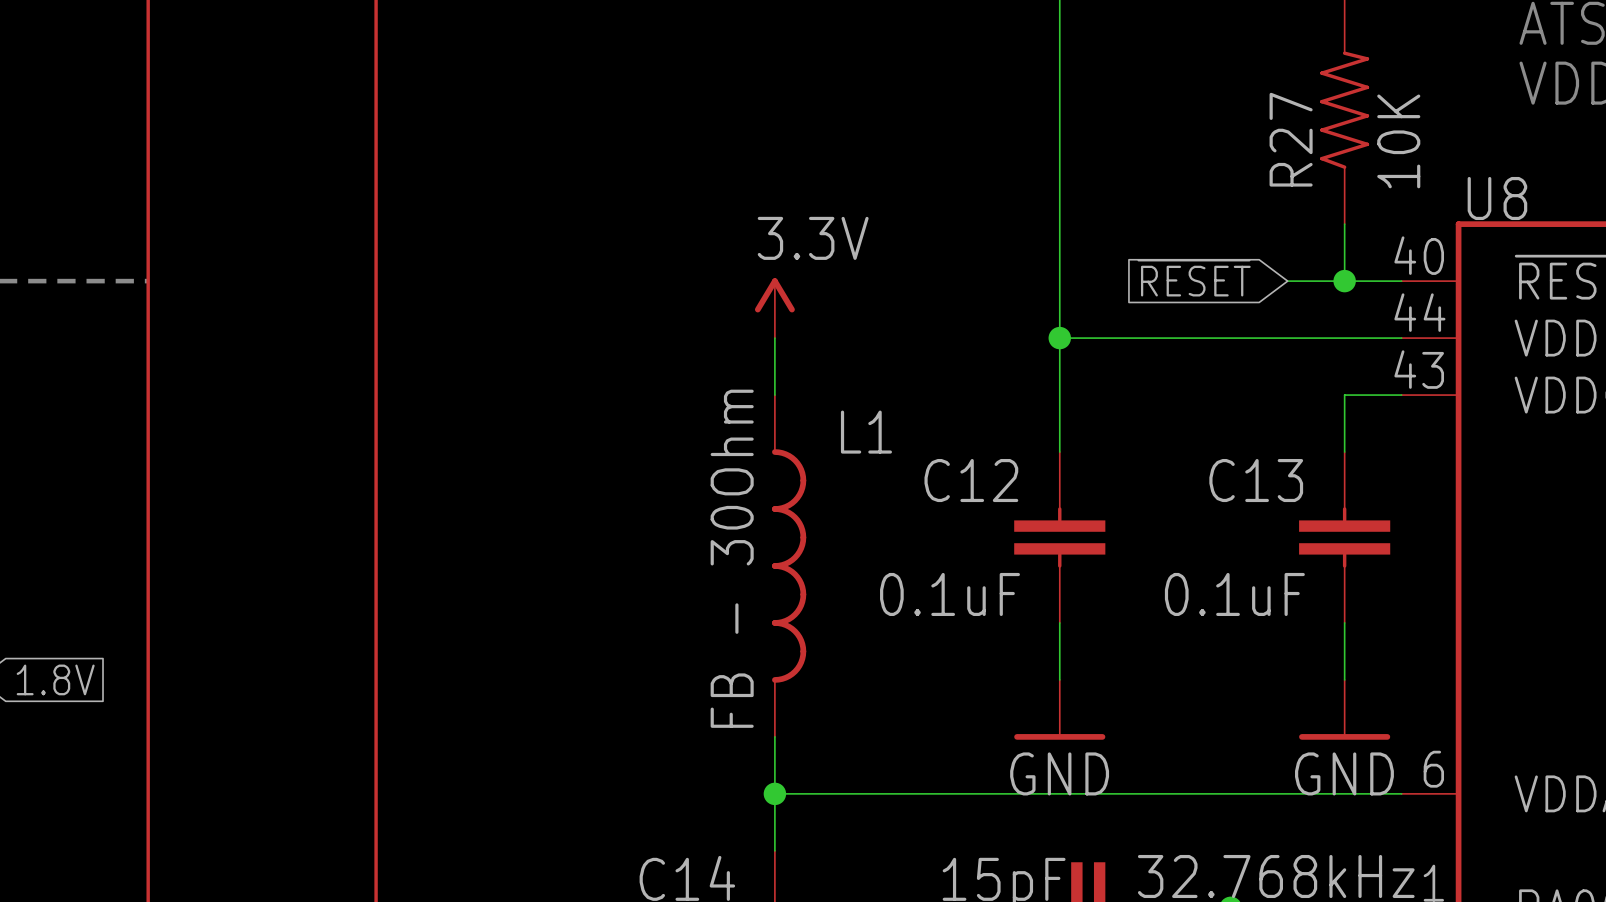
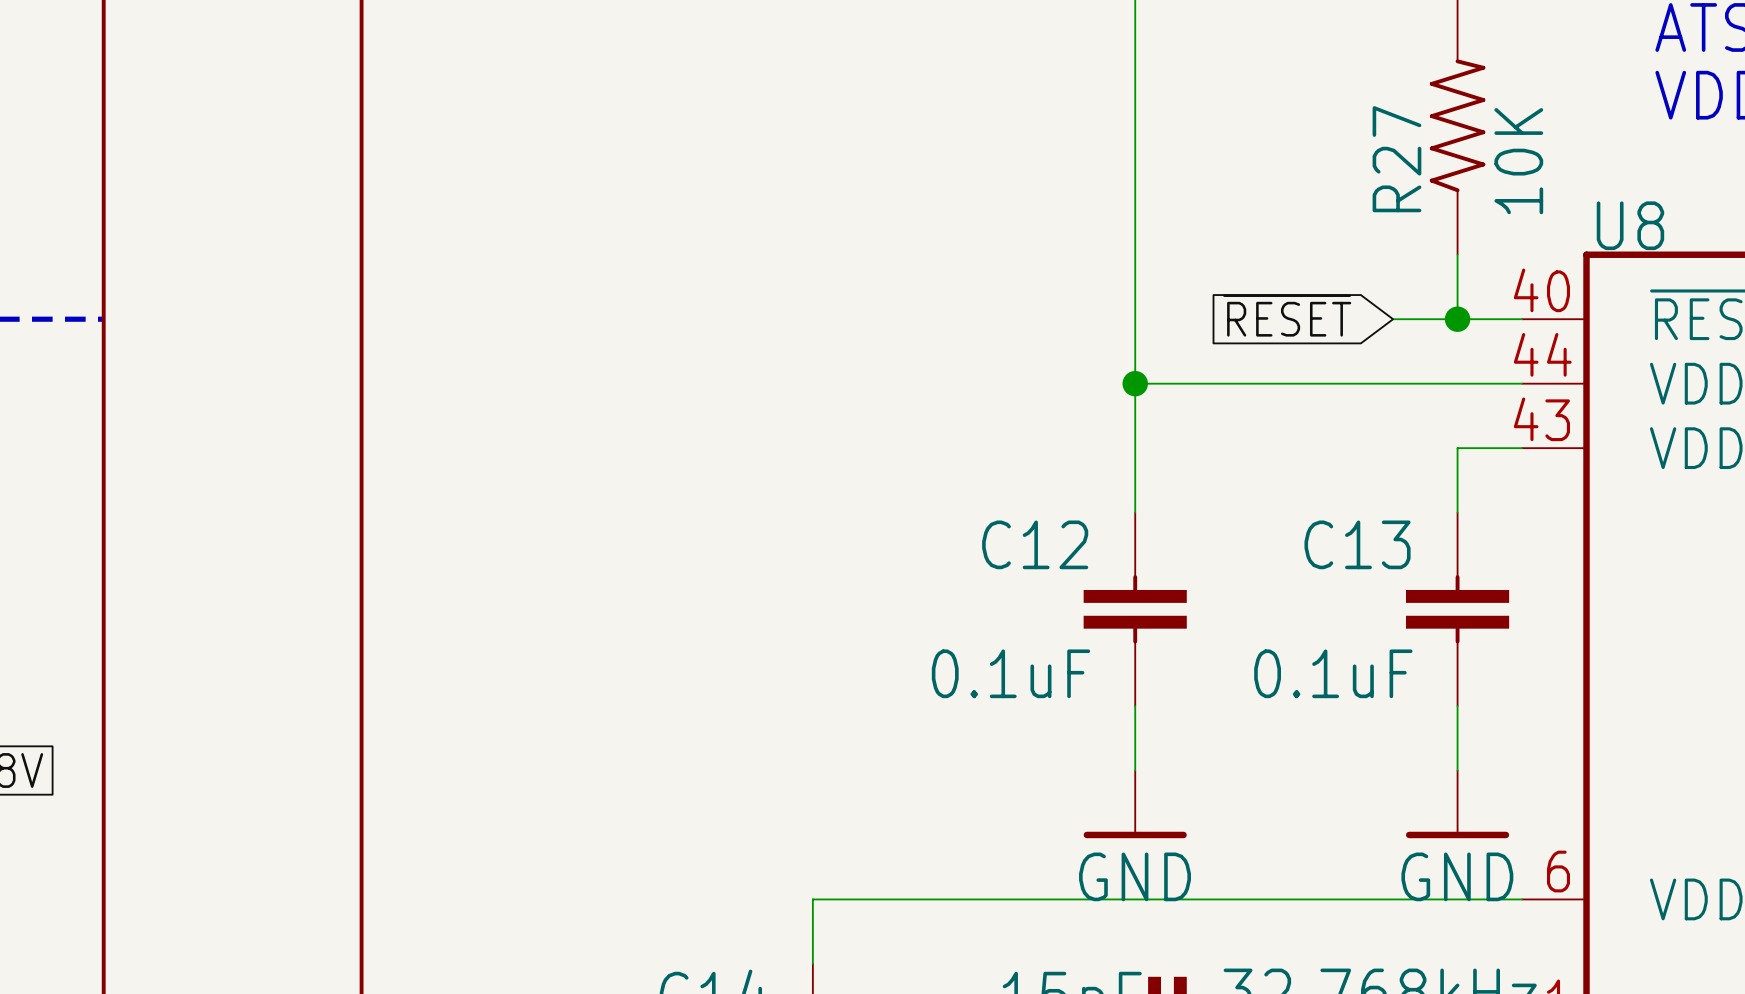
power symbol: 3.3V (774, 308) -> none
wire: (774, 338) (774, 395) -> none
L1: FB - 30Ohm (789, 565) -> none
wire: (774, 736) (774, 793) -> none
junction: (774, 793) -> none

